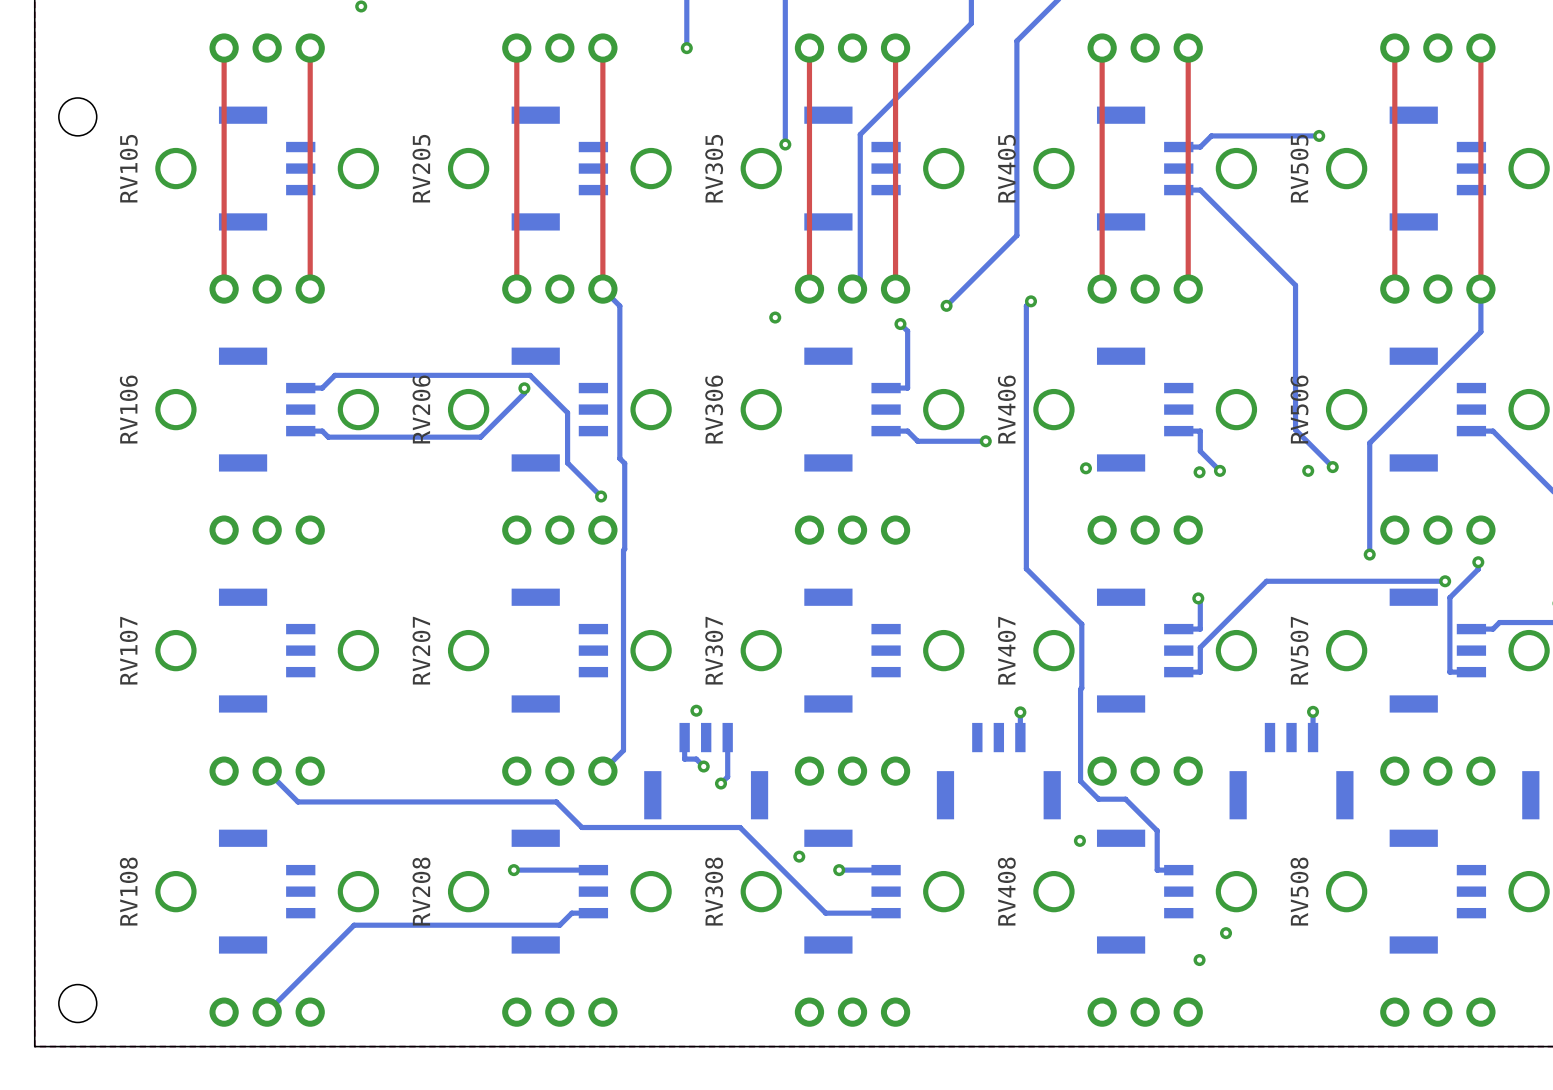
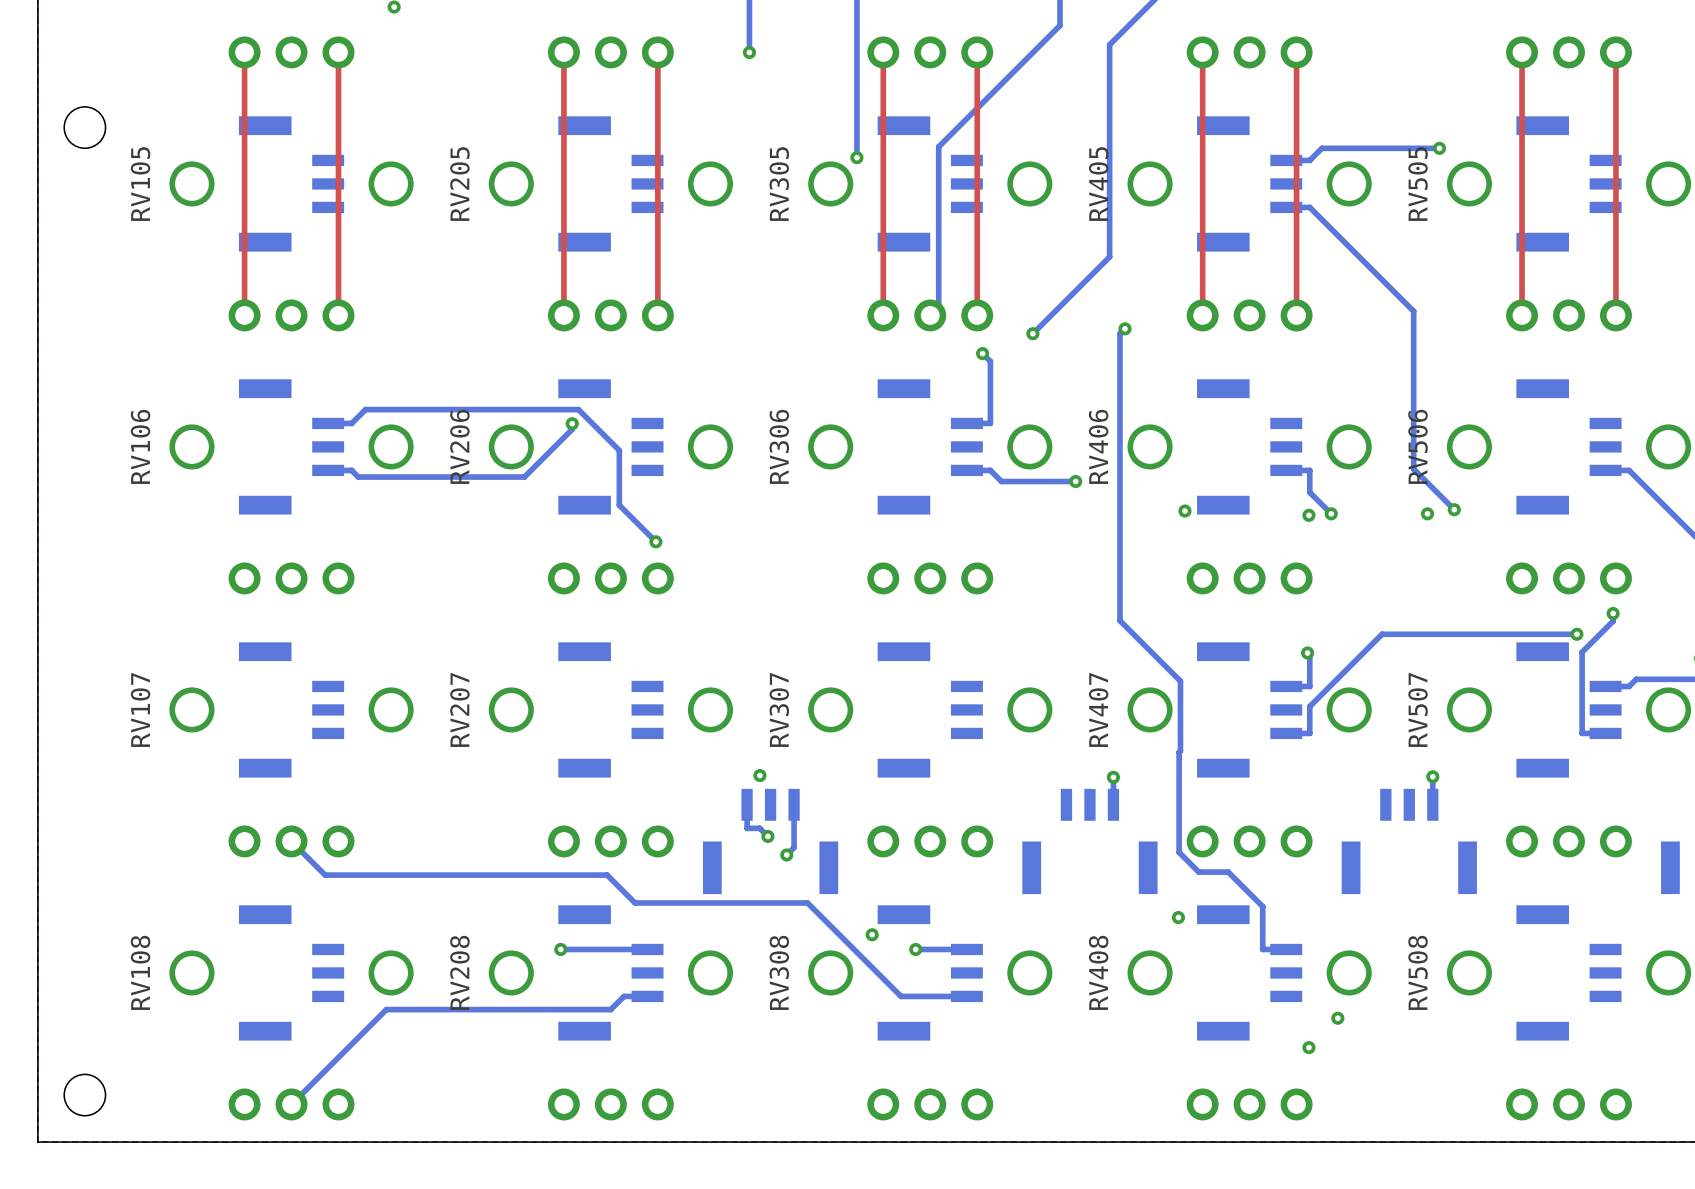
bottom track: (602, 289) (619, 306) (619, 458) (624, 463) (623, 750) (602, 771) -> none
bottom track: (1480, 289) (1480, 331) (1369, 443) (1369, 554) -> none
via: (775, 317) -> none
via: (1369, 554) -> none

